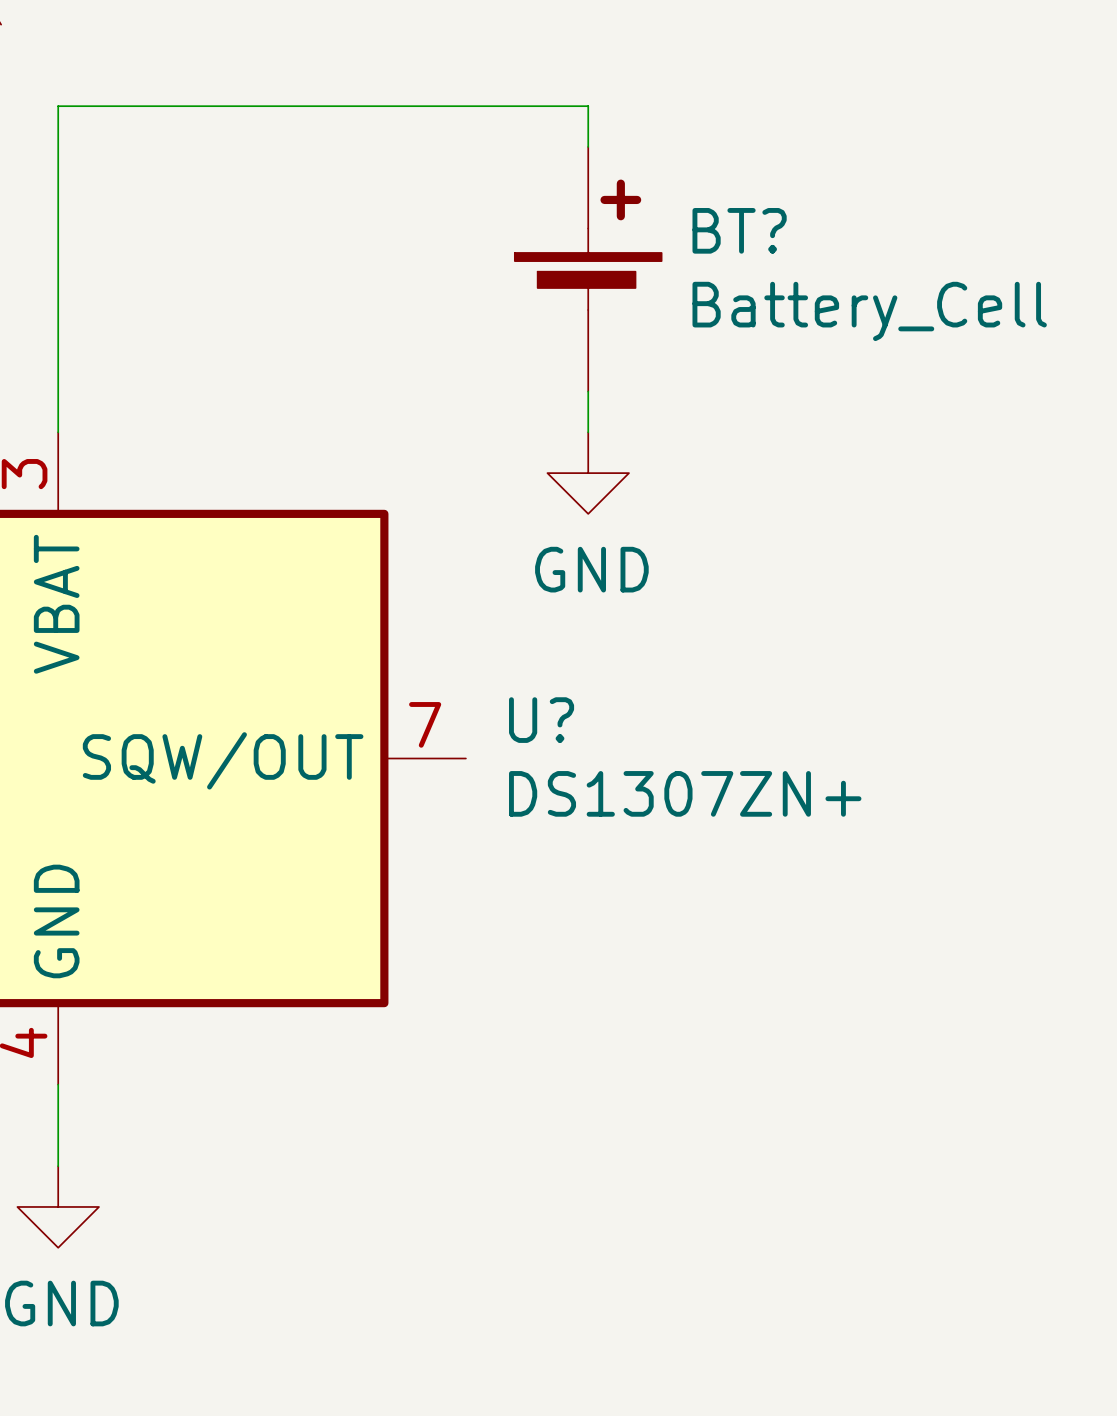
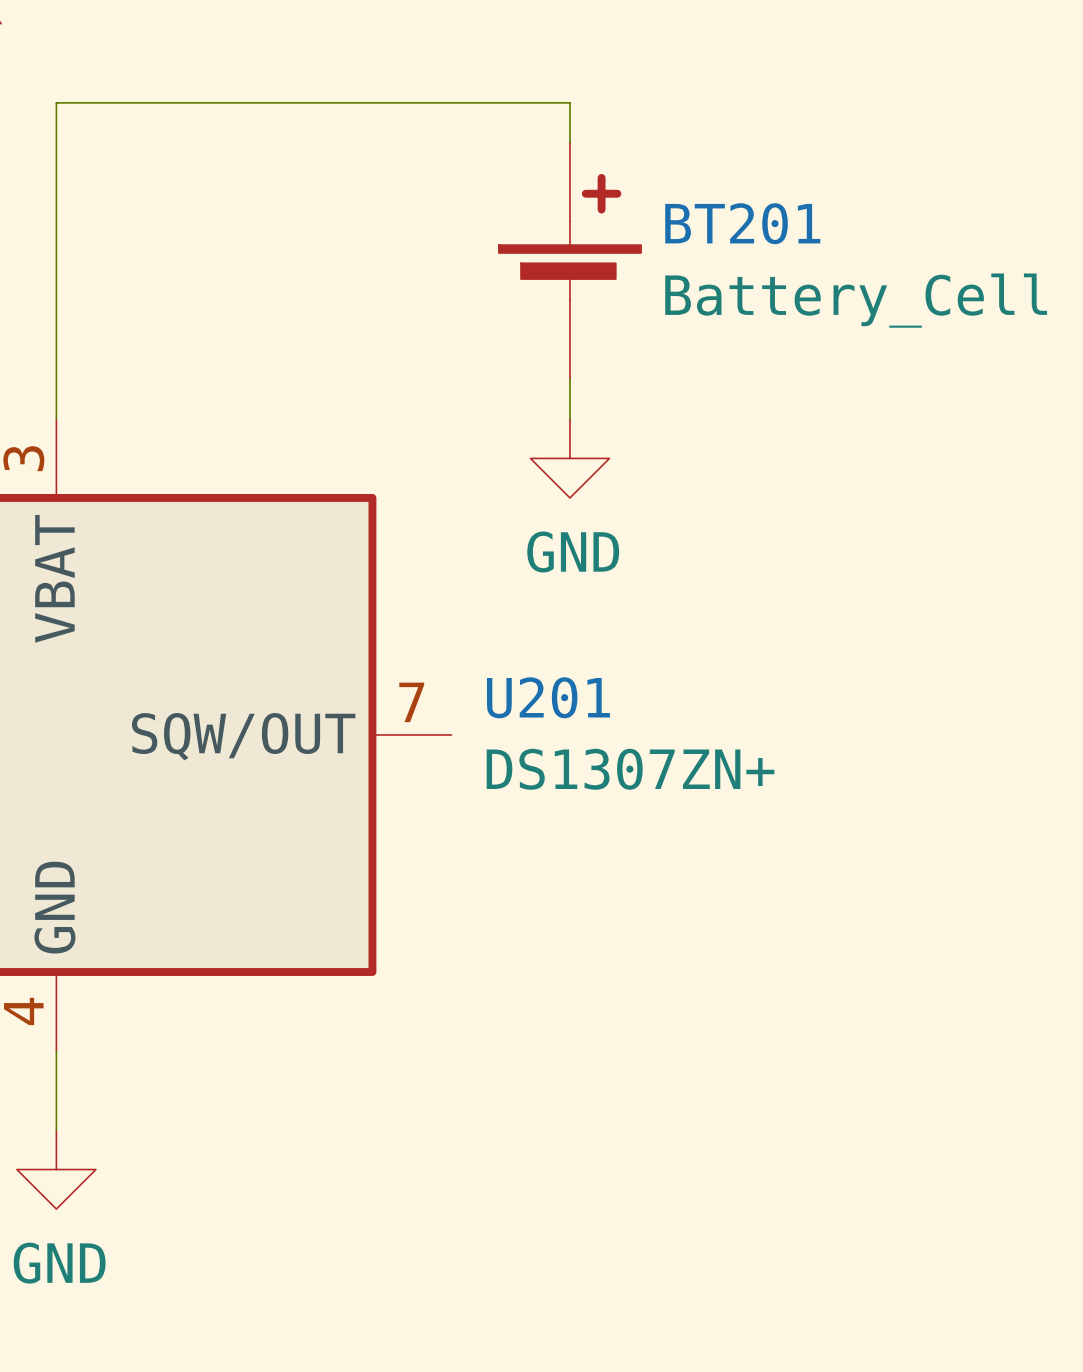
BT? name: BT? (739, 230) -> BT201 (742, 223)
U? name: U? (541, 720) -> U201 (548, 697)

